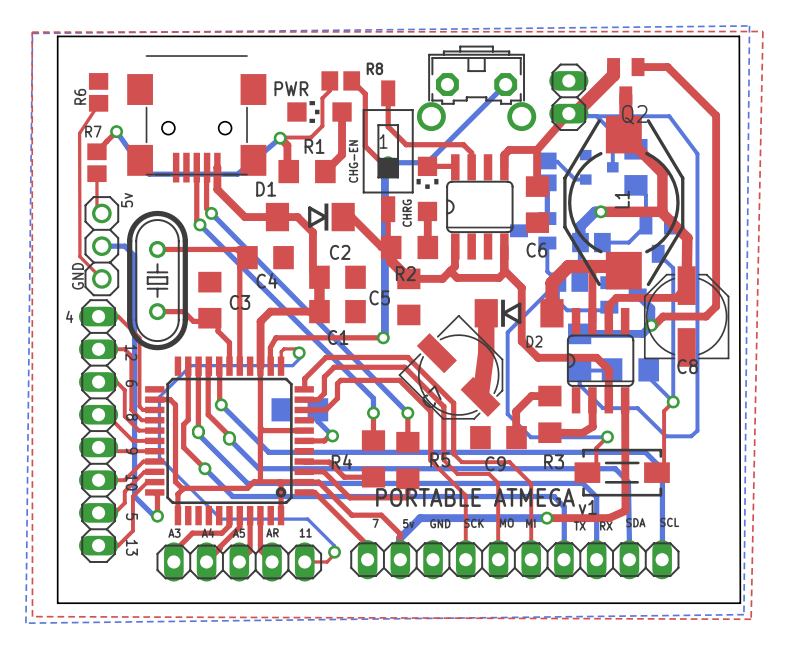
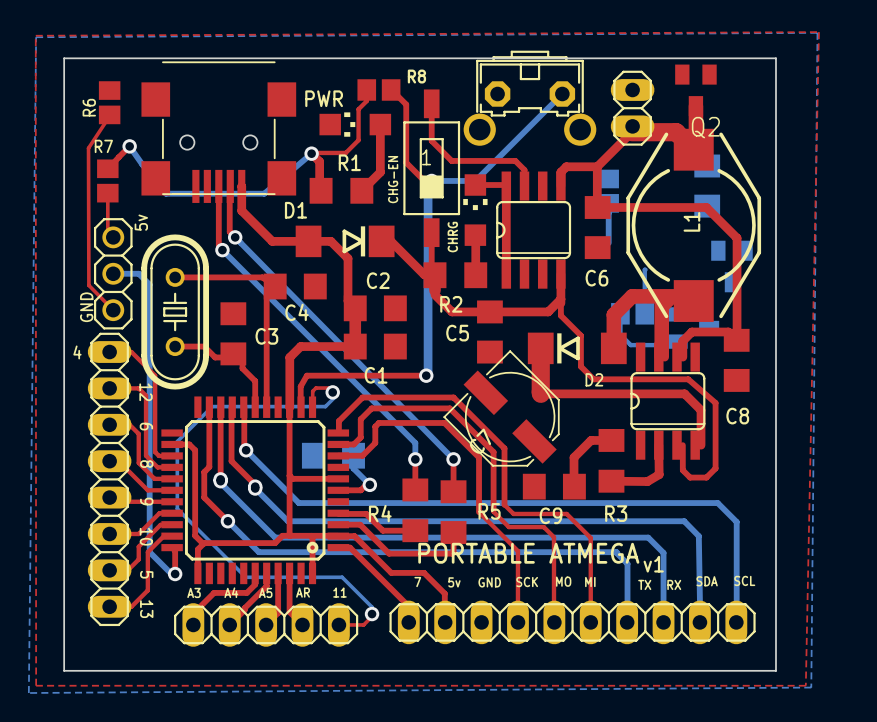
top zone outline: (32, 32) (762, 31) (751, 619) (32, 616) -> (35, 35) (818, 32) (805, 685) (36, 685)
bottom zone outline: (32, 33) (749, 25) (743, 614) (25, 623) -> (36, 37) (817, 32) (811, 687) (28, 693)
board edge: (57, 52) (57, 36) (739, 36) (740, 603) (697, 603) -> (64, 58) (775, 58) (775, 670)
top track: (613, 67) (613, 75) (572, 116) (565, 116) (568, 113) (537, 149) -> (693, 149) (676, 132) (631, 132) (597, 166)
top track: (638, 67) (667, 67) (716, 115) (716, 306) (705, 316) (663, 316) (653, 325) (651, 325) -> none
top track: (618, 146) (623, 134) (662, 173) (662, 211) (600, 211) -> none
bottom track: (546, 160) (557, 161) (575, 179) (585, 179) -> none
part: (599, 167) -> none
bottom track: (612, 167) (612, 132) (596, 115) (564, 115) (568, 113) (565, 116) (669, 116) (697, 153) (697, 430) (691, 436) (666, 436) (637, 408) (602, 408) (579, 384) (579, 370) (612, 369) -> none
bottom track: (635, 185) (645, 195) (645, 225) (628, 242) (602, 242) -> none
top track: none -> (597, 207) (706, 207) (737, 238) (737, 339) (728, 332) (691, 332) (682, 341) (682, 357)
bottom track: (600, 211) (595, 211) (580, 226) (580, 242) -> none
via: (600, 211) -> none
top track: (661, 211) (687, 238) (686, 285) (676, 297) (616, 297) (608, 305) (608, 321) -> none
part: (533, 230) -> none
part: (591, 242) -> none
bottom track: (547, 243) (547, 271) (557, 282) -> none
top track: (455, 246) (454, 266) (442, 278) (408, 278) (391, 261) -> (506, 274) (506, 186)
top track: none -> (560, 274) (560, 299) (548, 311) (452, 311) (434, 294)
bottom track: (658, 253) (673, 268) (673, 401) (648, 377) (648, 369) -> none
C8 footprint: [644, 266, 730, 367] -> [723, 328, 750, 392]
top track: (504, 270) (521, 287) (521, 341) (538, 357) (596, 357) (608, 369) (608, 400) -> none
top track: none -> (671, 301) (664, 307) (664, 357)
top track: (450, 271) (457, 277) (499, 277) (504, 272) -> (682, 445) (682, 470) (690, 477) (706, 477) (715, 468) (715, 402) (688, 379) (593, 379) (580, 366) (580, 335) (560, 315) (560, 303)
bottom track: (557, 282) (507, 332) (507, 414) (530, 437) (607, 436) -> none
C5 position: (408, 296) -> (489, 332)
bottom track: (640, 298) (637, 294) (651, 308) (651, 325) (642, 333) (579, 333) -> none
via: (651, 325) -> none
top track: (486, 352) (480, 396) (484, 354) -> (540, 392) (539, 393) (684, 393) (701, 410) (701, 445)
part: (579, 352) -> none
part: (630, 369) -> none
top track: (625, 400) (625, 510) (609, 518) (546, 518) -> none
via: (673, 401) -> none
top track: (674, 401) (664, 411) (664, 472) (656, 472) -> none
top track: (607, 436) (596, 448) (596, 472) (587, 472) -> none
via: (607, 436) -> none
part: (622, 472) -> none
bottom track: (546, 518) (420, 518) (399, 538) (400, 559) -> none
via: (546, 518) -> none

